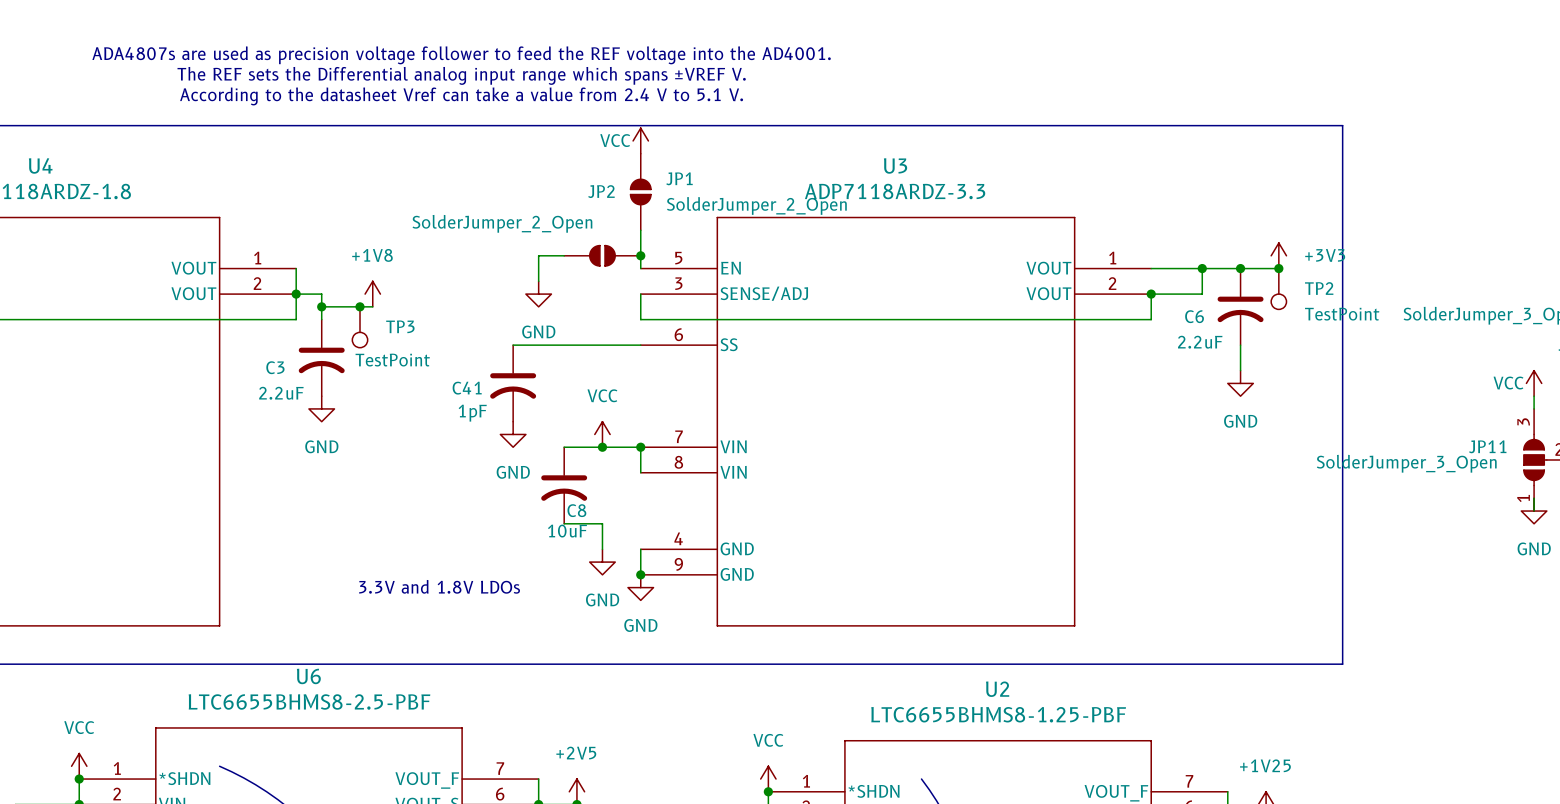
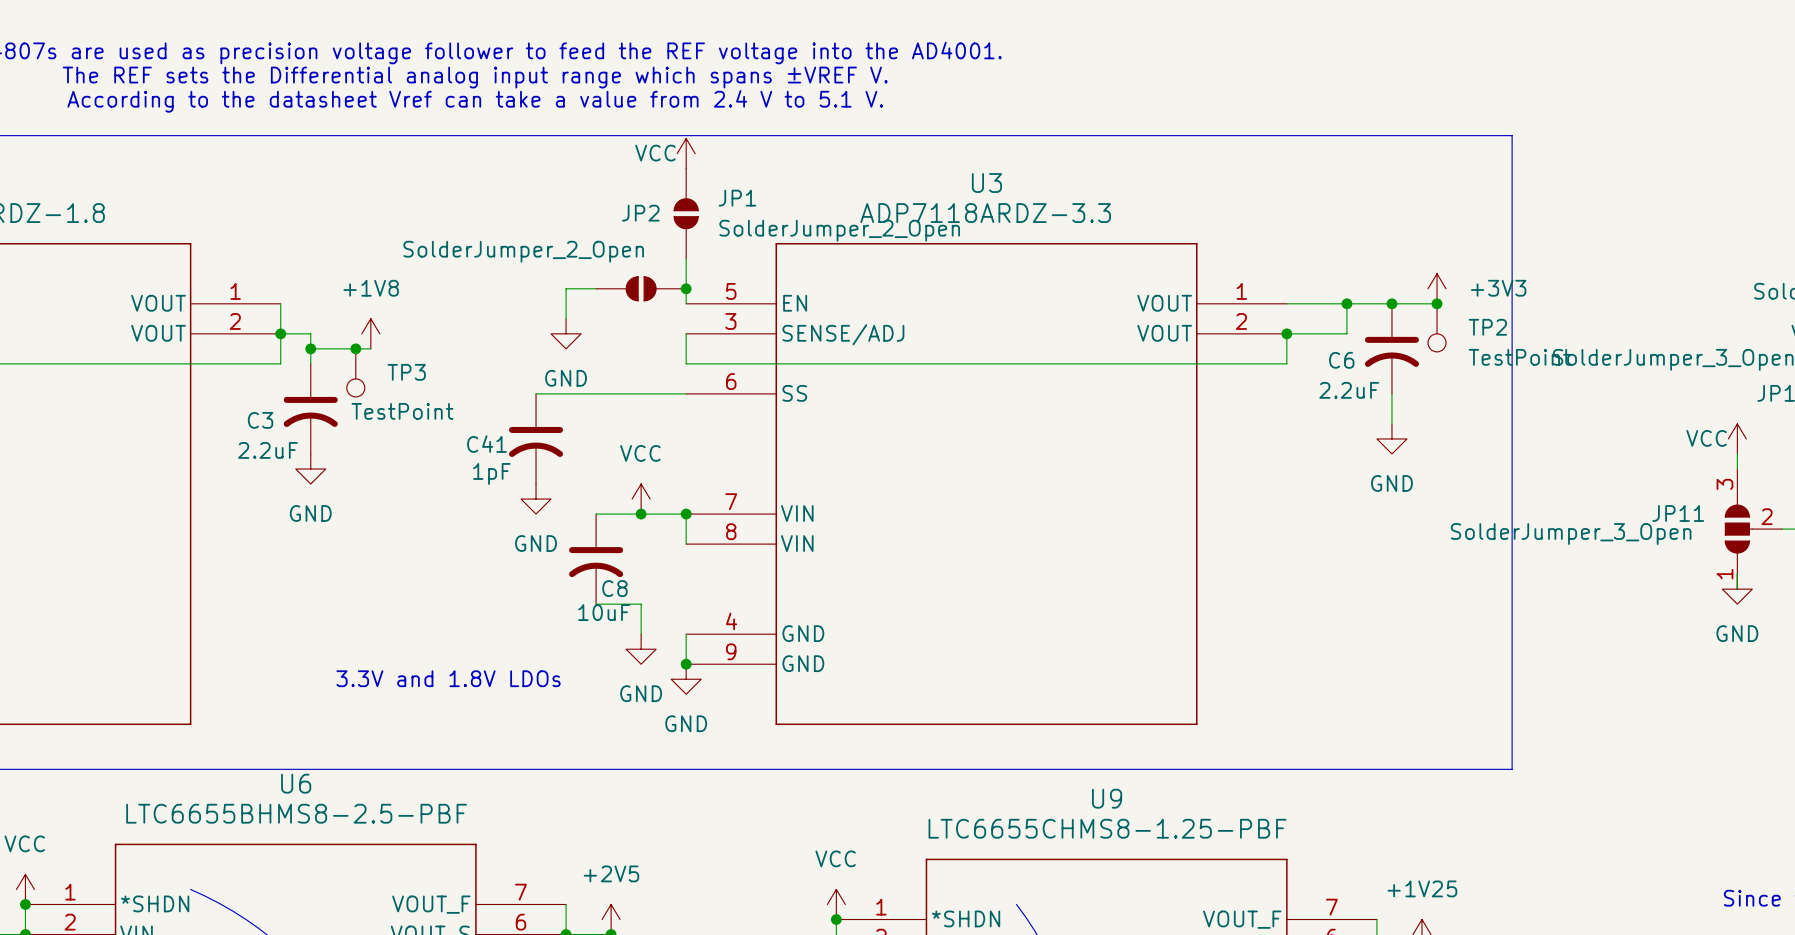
U2 name: U2 (997, 689) -> U9 (1107, 798)
U2 value: LTC6655BHMS8-1.25-PBF (998, 714) -> LTC6655CHMS8-1.25-PBF (1107, 828)

